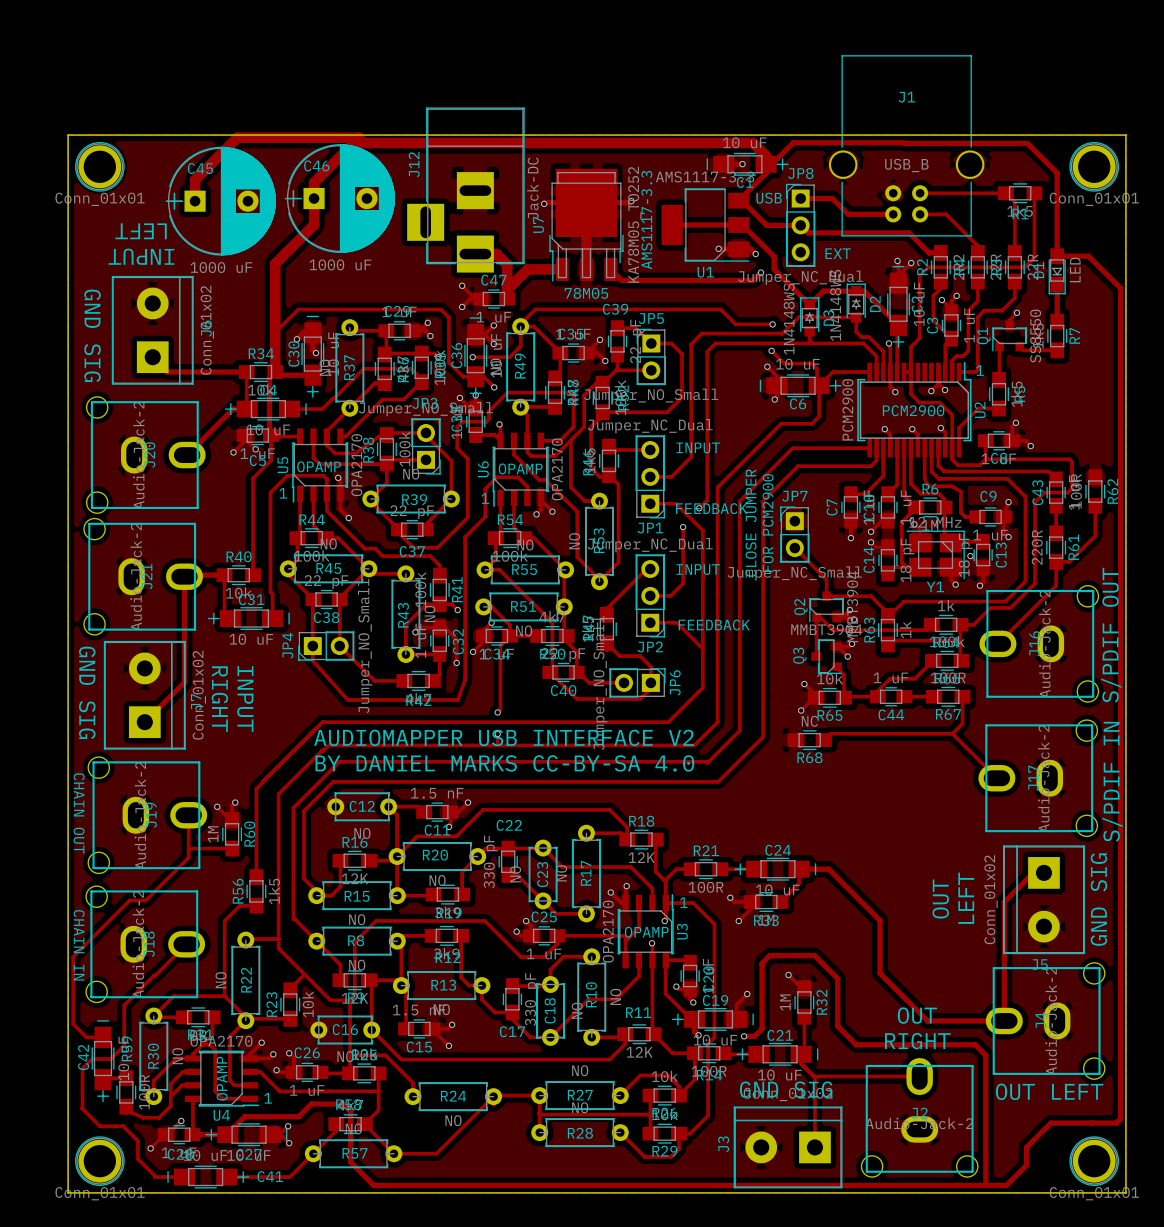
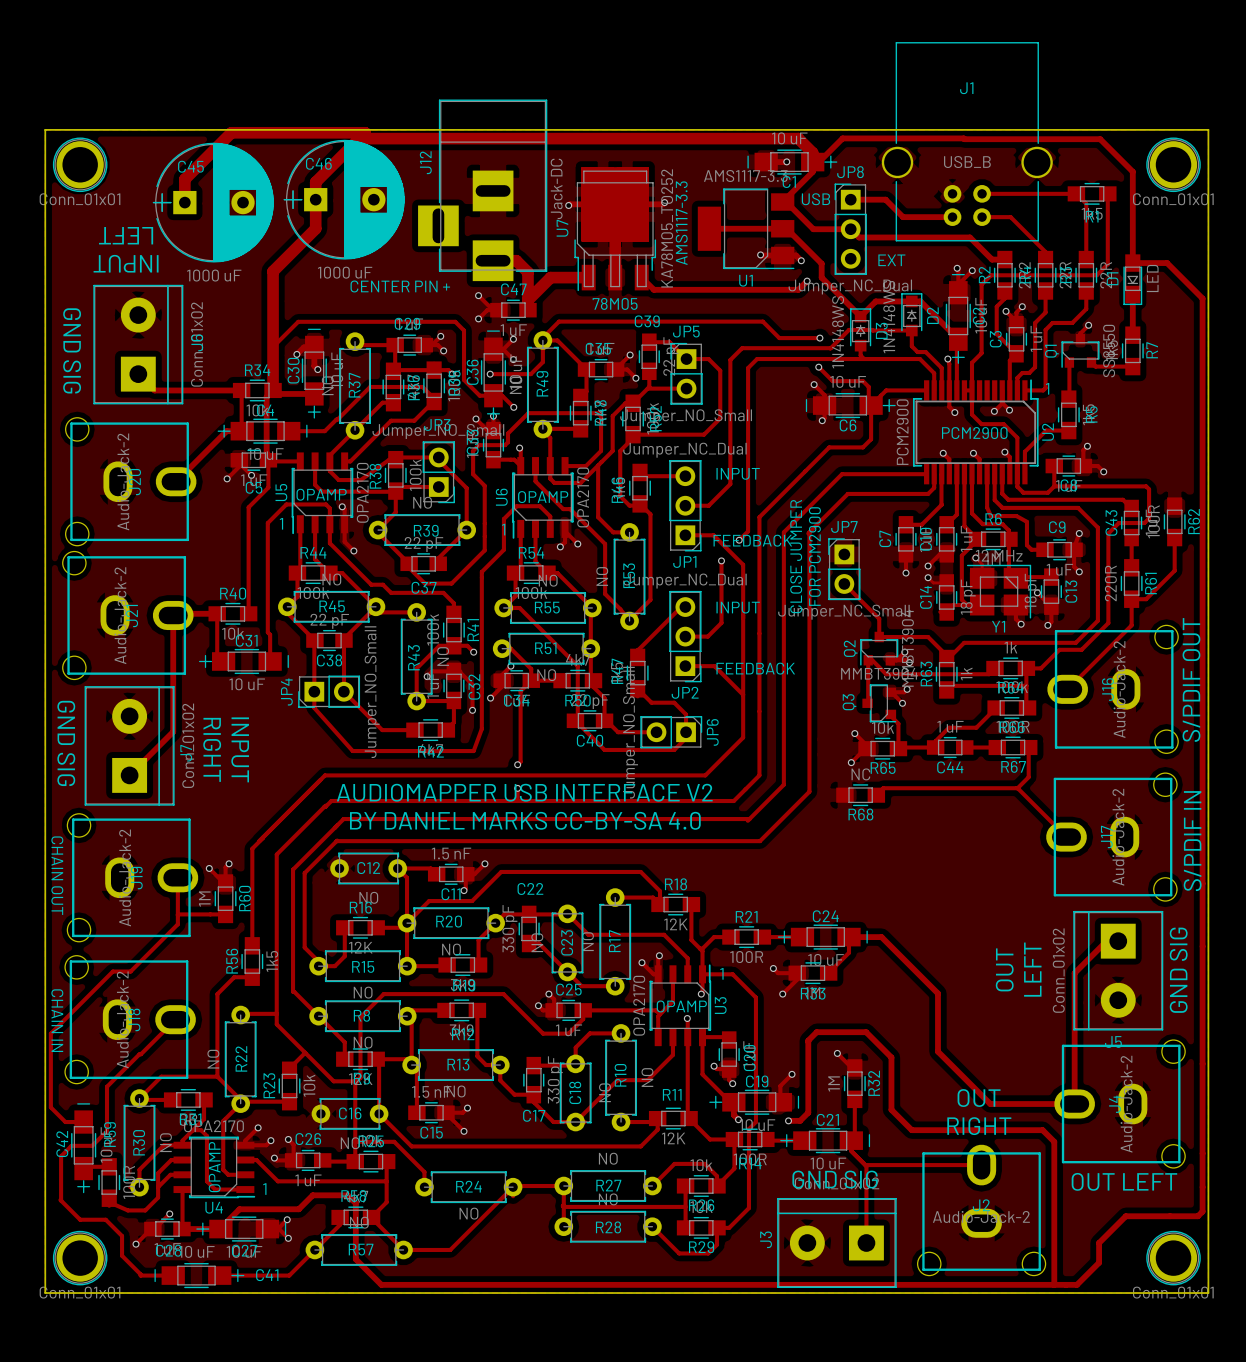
text: none -> CENTER PIN + (400, 286)

